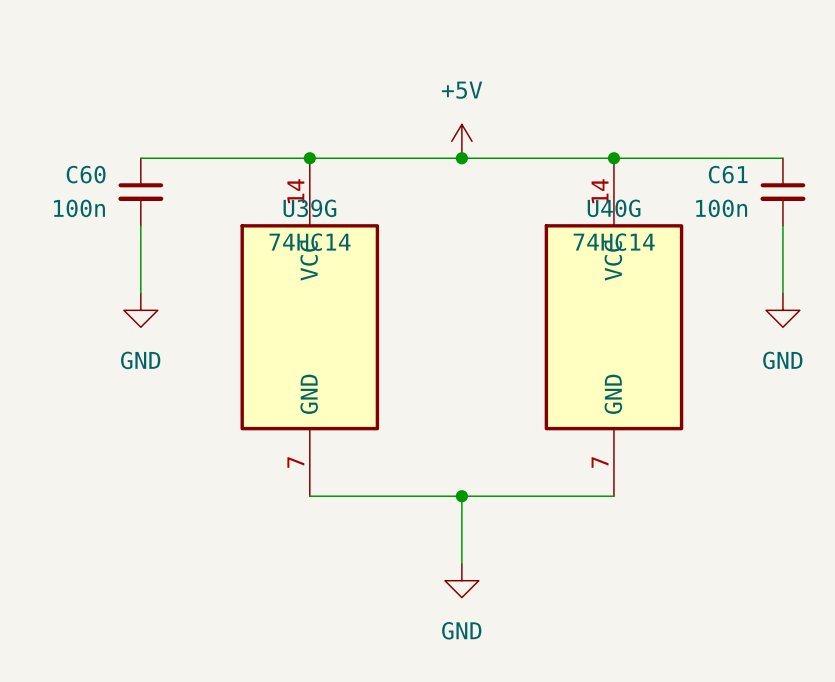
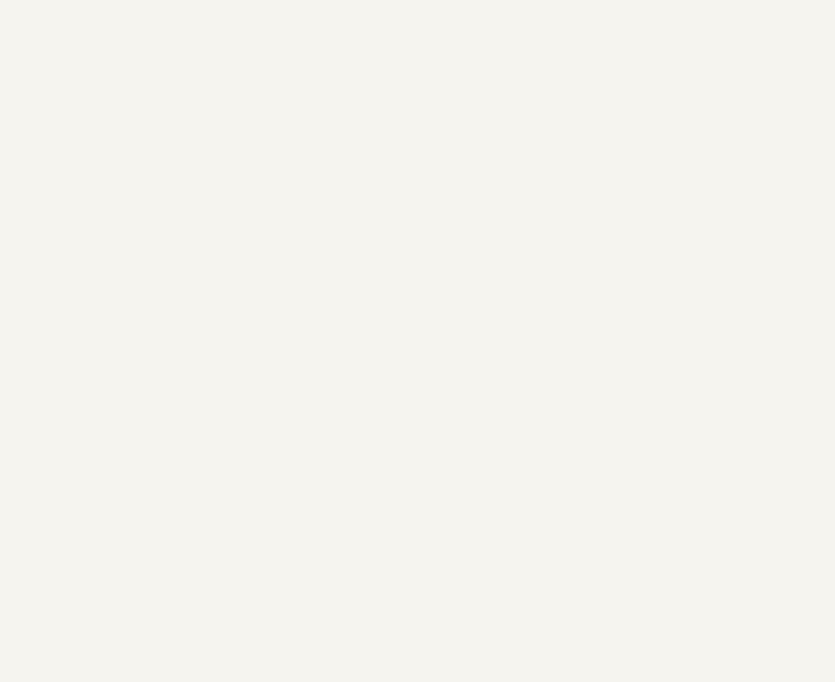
power symbol: +5V (461, 141) -> none
wire: (140, 158) (782, 158) -> none
junction: (309, 158) -> none
junction: (461, 158) -> none
junction: (613, 158) -> none
C60: 100n (140, 192) -> none
C61: 100n (782, 192) -> none
wire: (140, 225) (140, 293) -> none
wire: (782, 225) (782, 293) -> none
power symbol: GND (140, 310) -> none
power symbol: GND (782, 310) -> none
U39G: 74HC14 (309, 327) -> none
U40G: 74HC14 (613, 327) -> none
wire: (309, 496) (613, 496) -> none
wire: (461, 496) (461, 563) -> none
junction: (461, 496) -> none
power symbol: GND (461, 580) -> none

